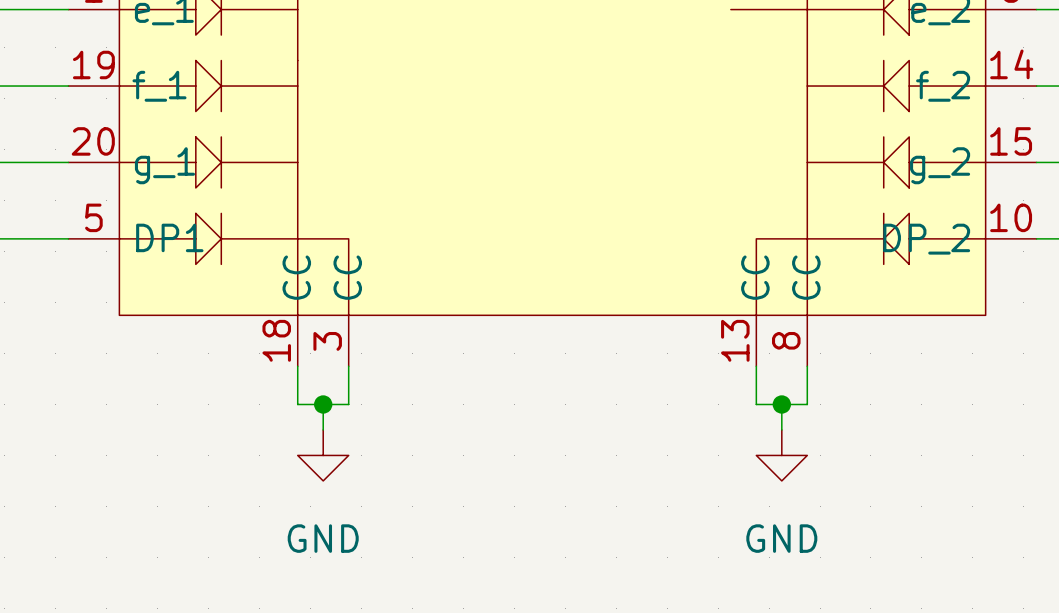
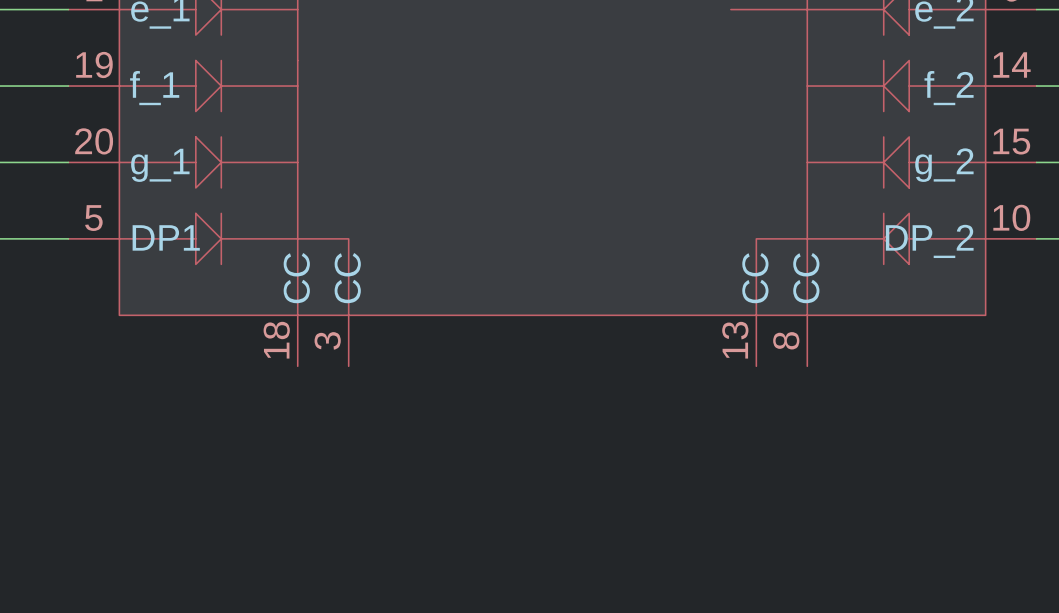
wire: (297, 366) (297, 404) (348, 404) (348, 366) -> none
wire: (756, 366) (756, 404) (807, 404) (807, 366) -> none
wire: (323, 404) (323, 429) -> none
junction: (323, 404) -> none
wire: (781, 404) (781, 429) -> none
junction: (781, 404) -> none
power symbol: GND (323, 455) -> none
power symbol: GND (781, 455) -> none

